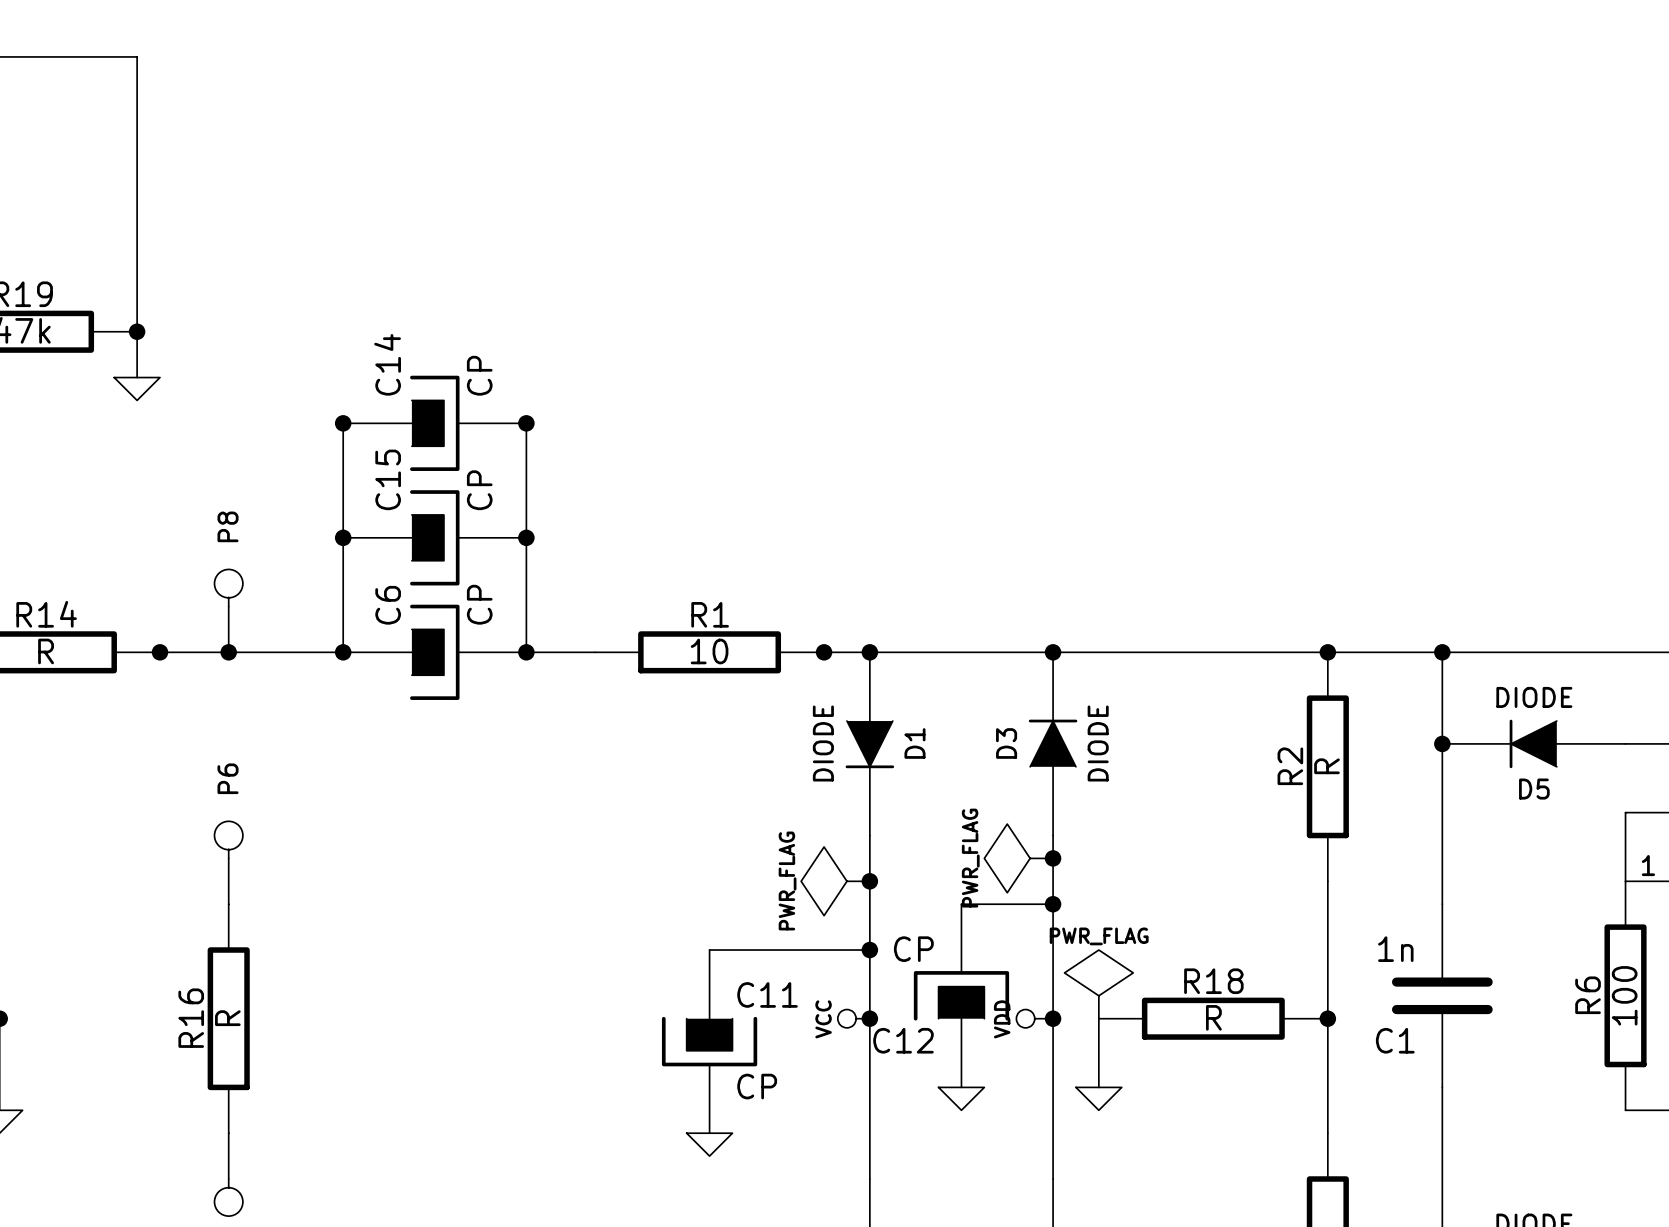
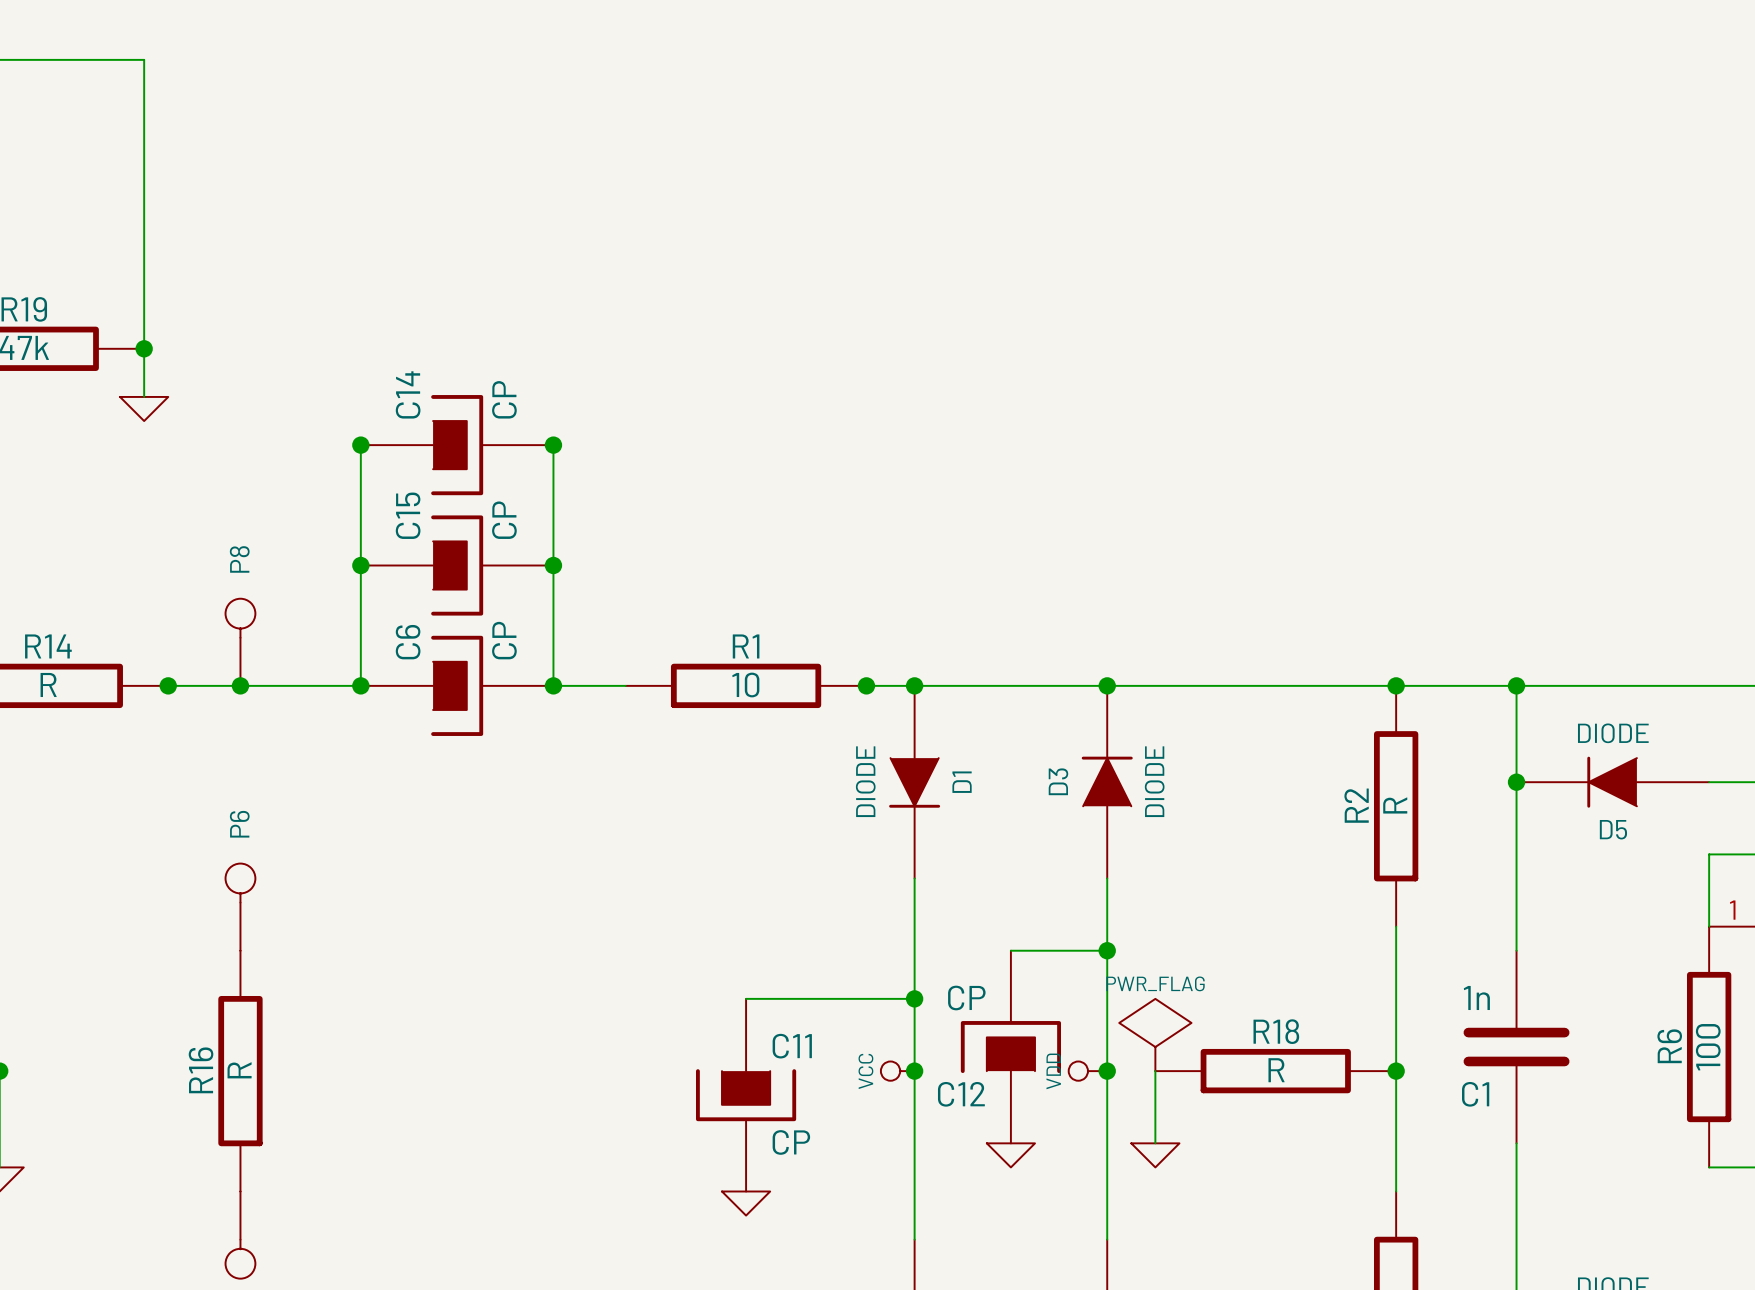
power symbol: PWR_FLAG (1018, 858) -> none
junction: (1053, 858) -> none
power symbol: PWR_FLAG (835, 881) -> none
junction: (869, 881) -> none

